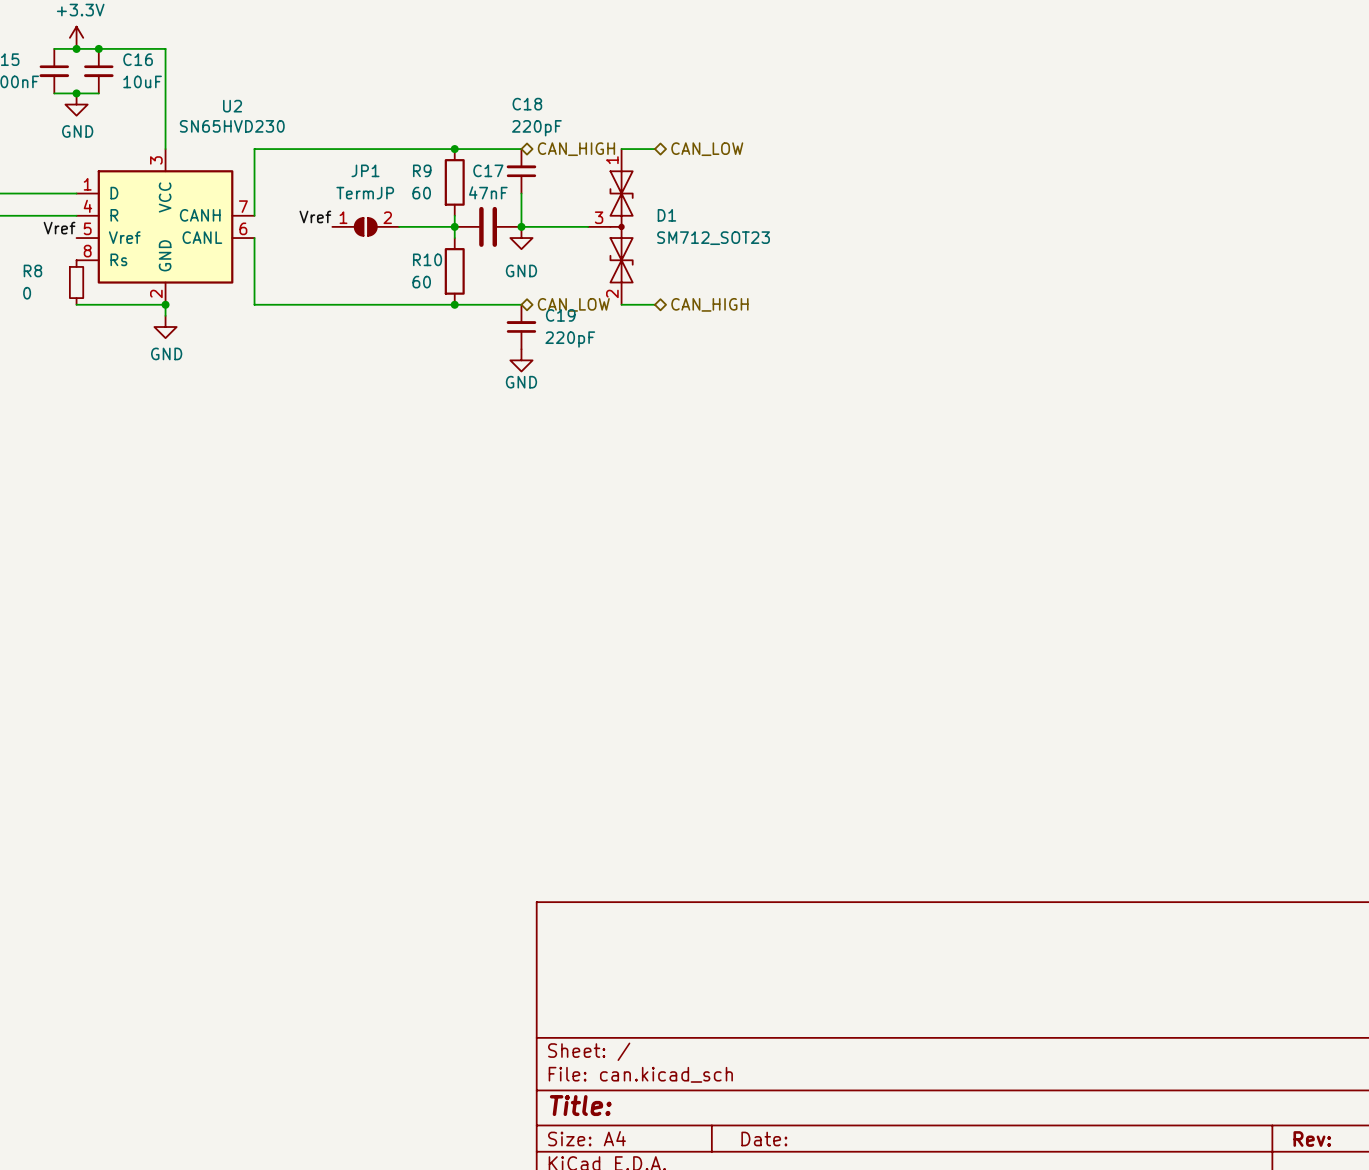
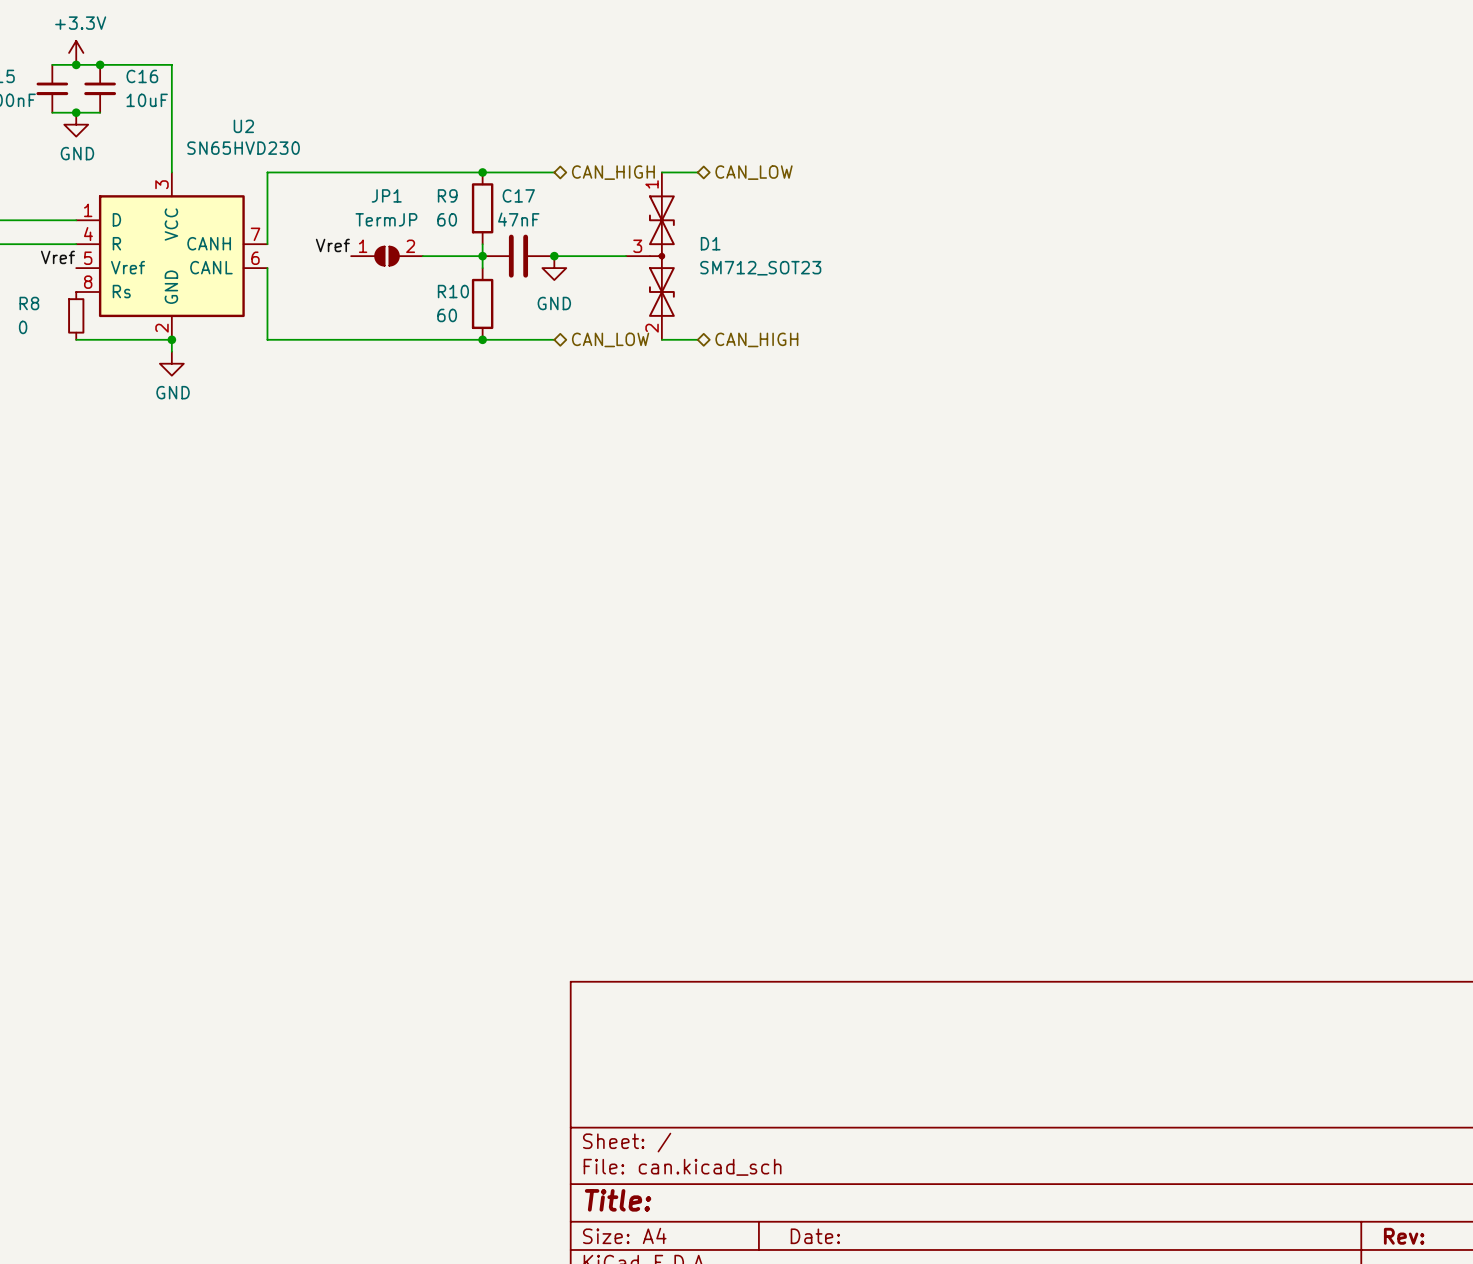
C18: 220pF (521, 171) -> none
wire: (521, 193) (521, 226) -> none
C19: 220pF (521, 327) -> none
power symbol: GND (521, 360) -> none

